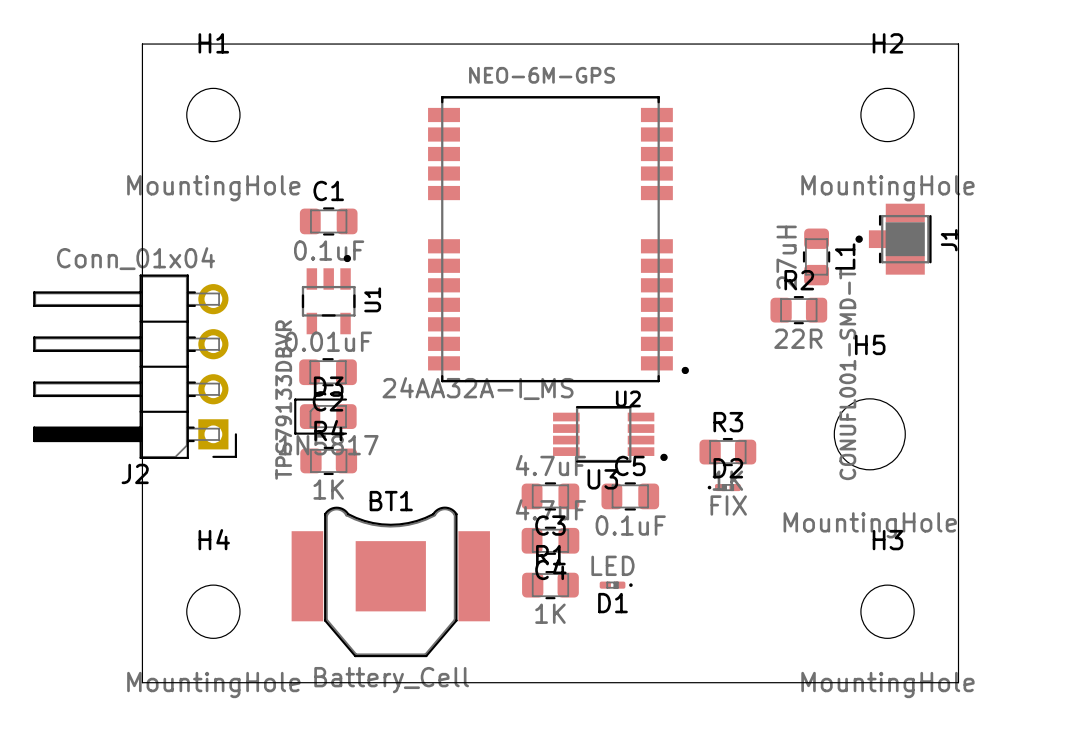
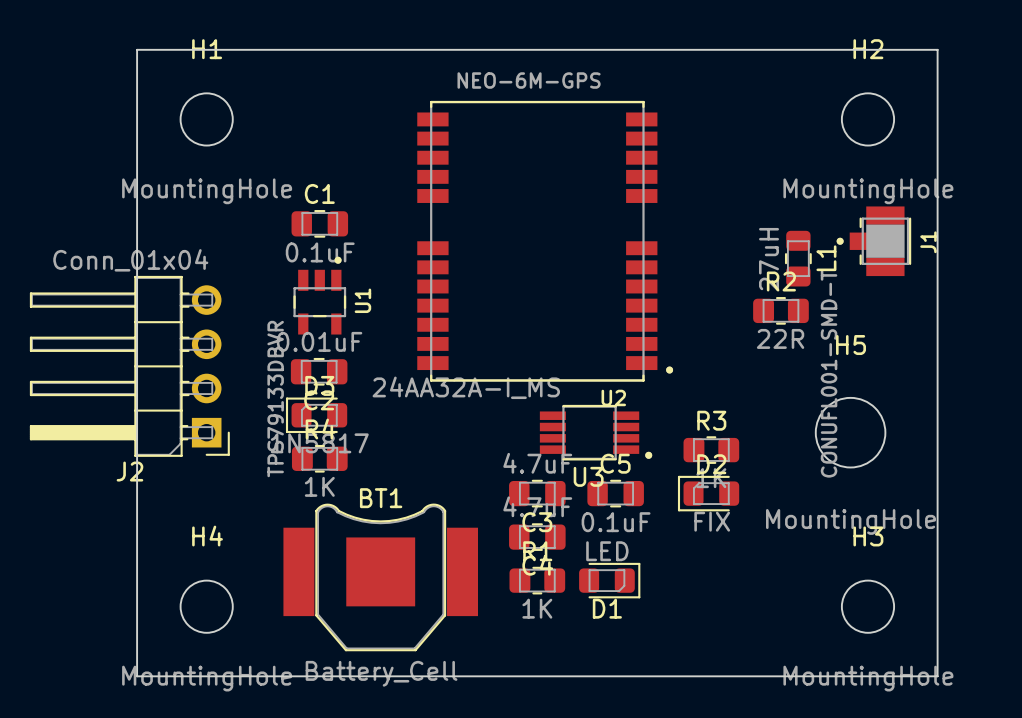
D2 footprint: [707, 484, 741, 492] -> [677, 475, 740, 512]
D1 footprint: [599, 581, 633, 589] -> [579, 562, 641, 599]

